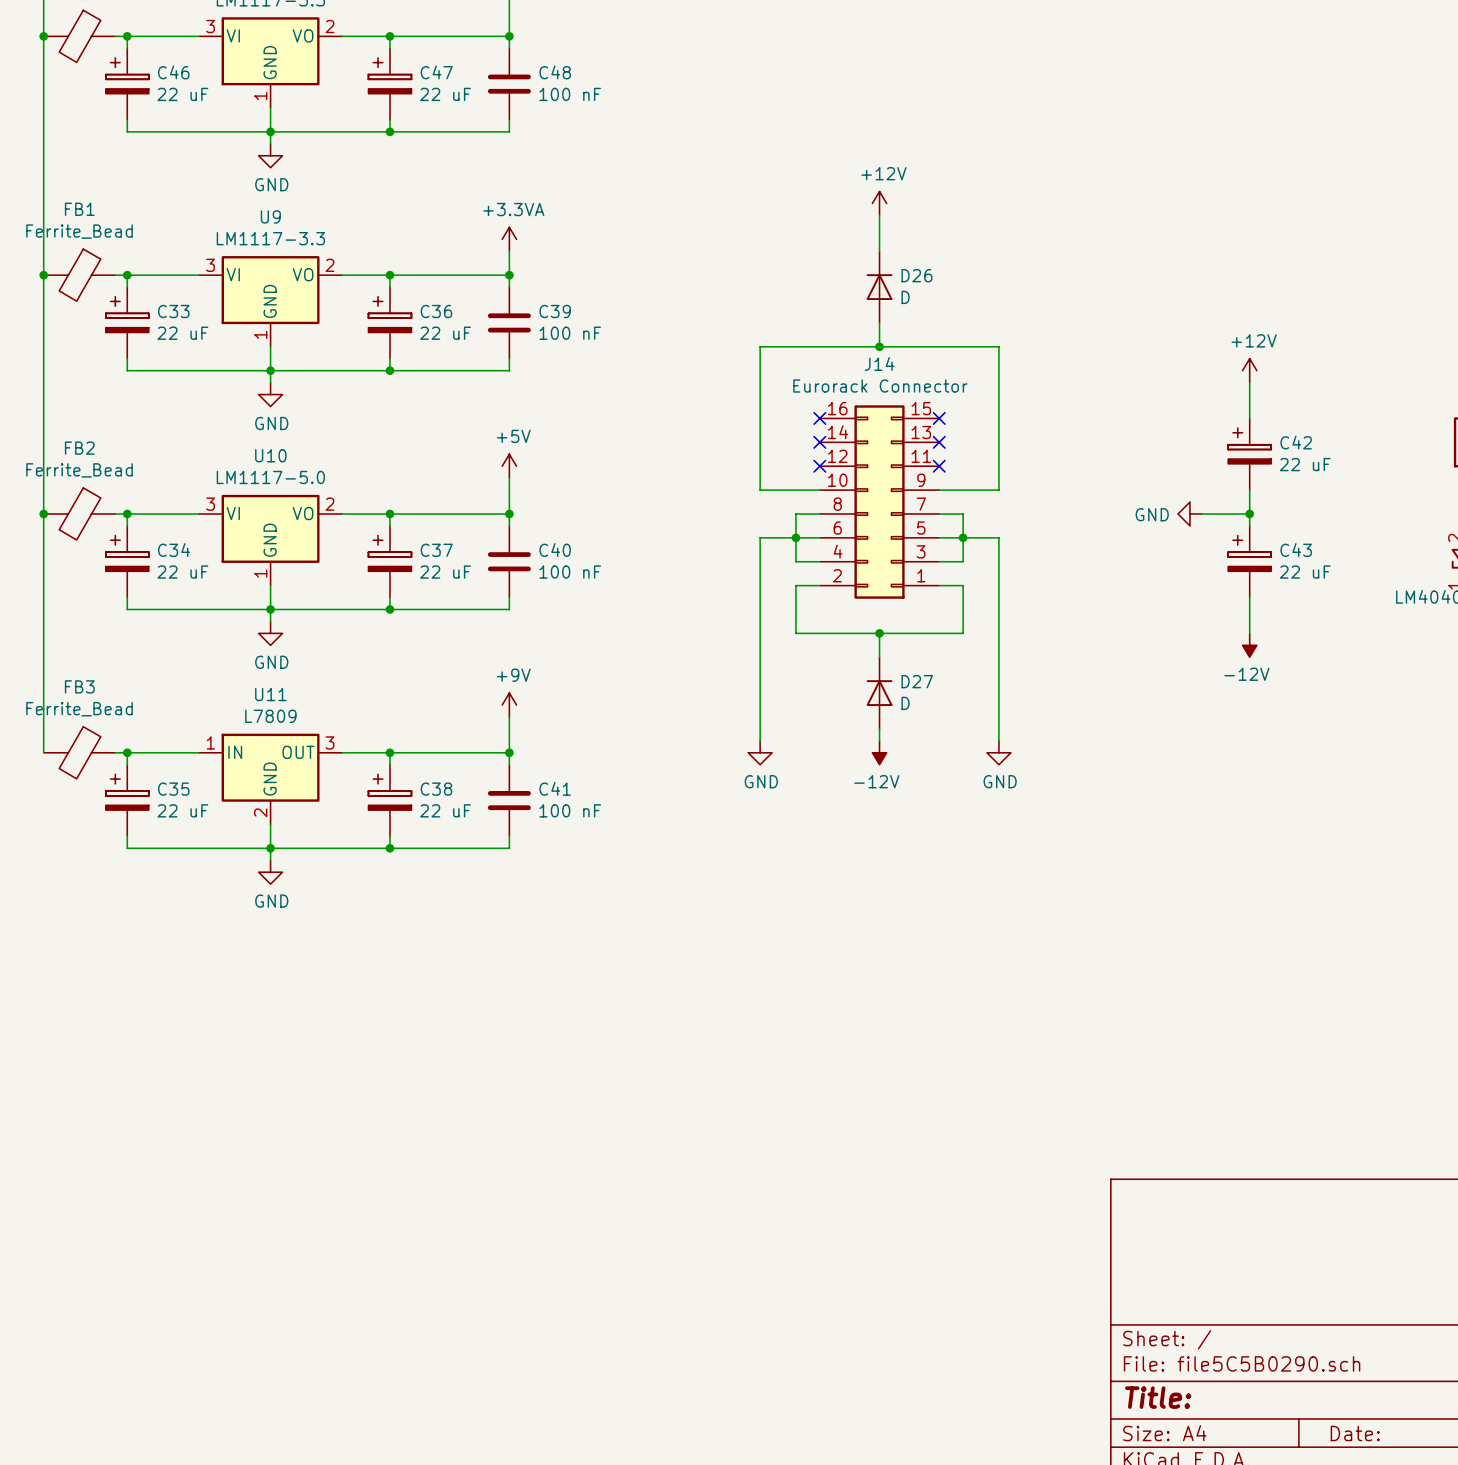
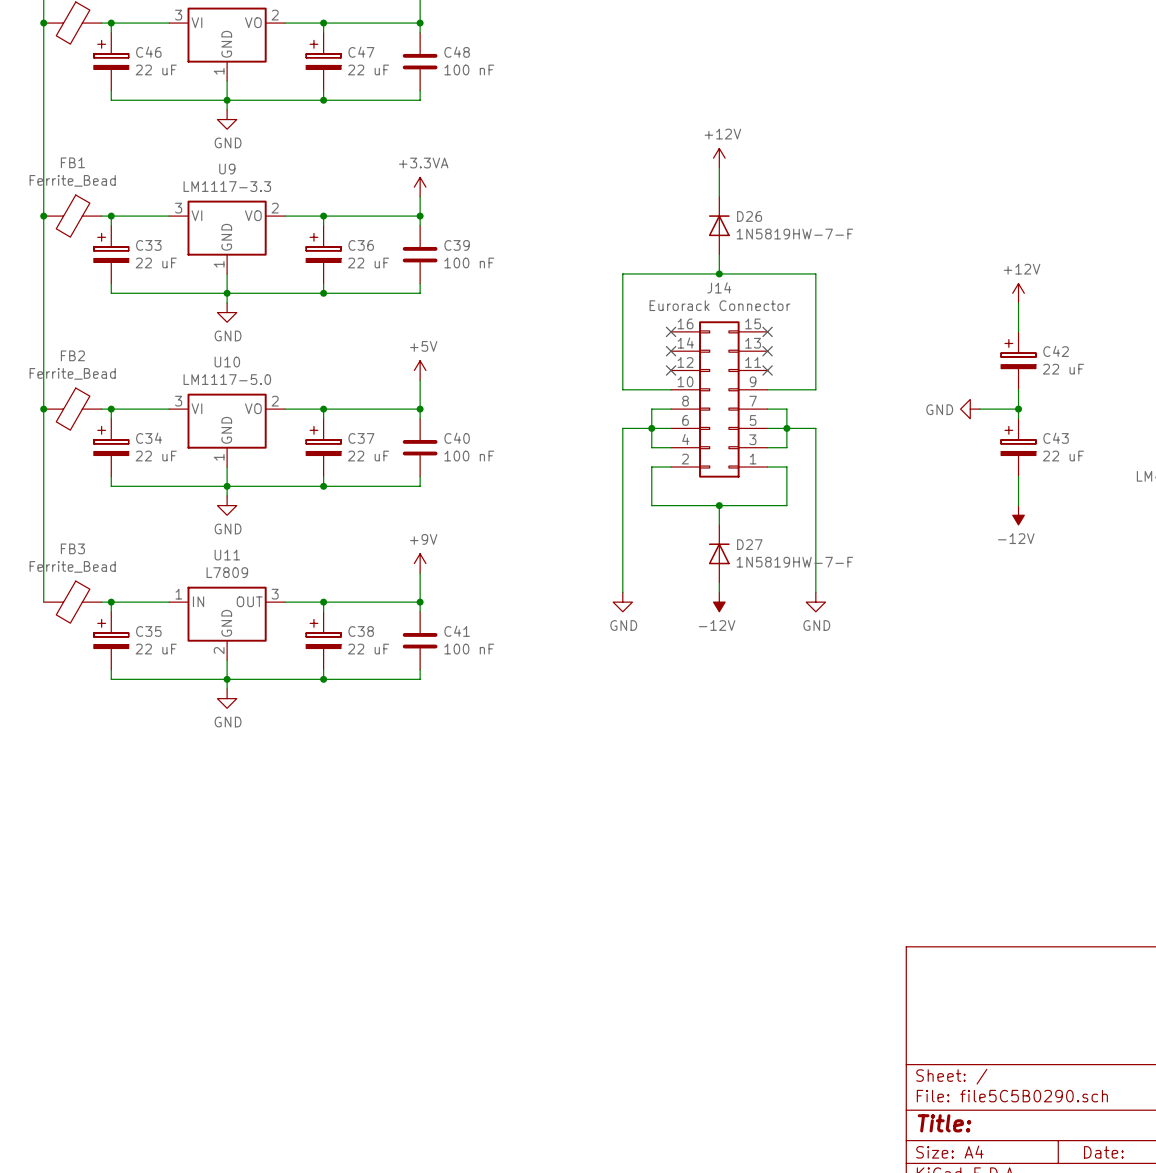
D26 value: D (905, 297) -> 1N5819HW-7-F (794, 234)
D27 value: D (905, 703) -> 1N5819HW-7-F (794, 562)

